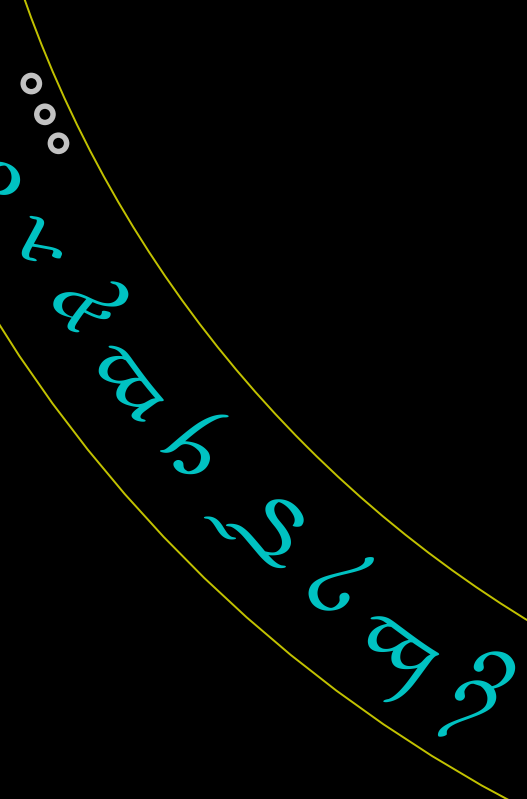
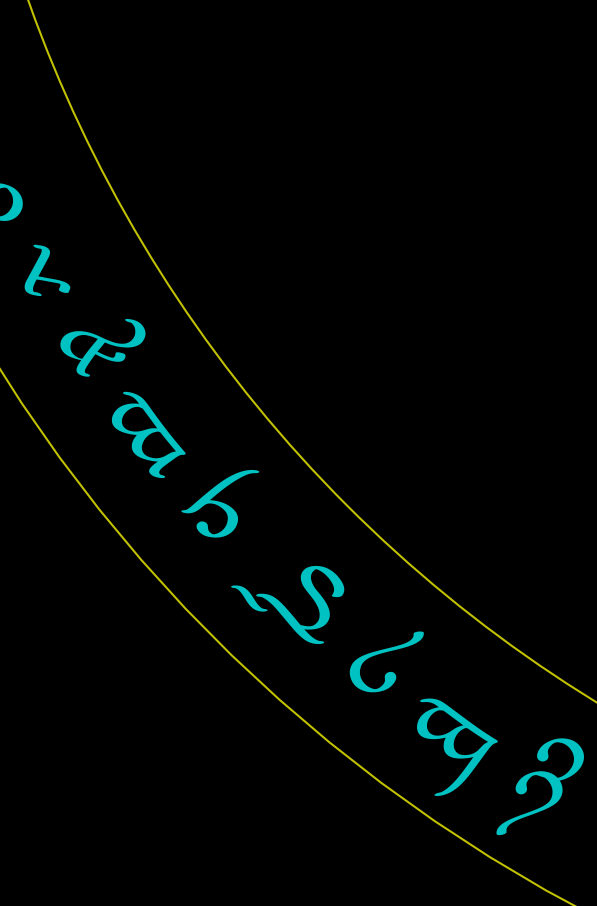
via: (31, 83) -> none
via: (44, 114) -> none
via: (58, 143) -> none

